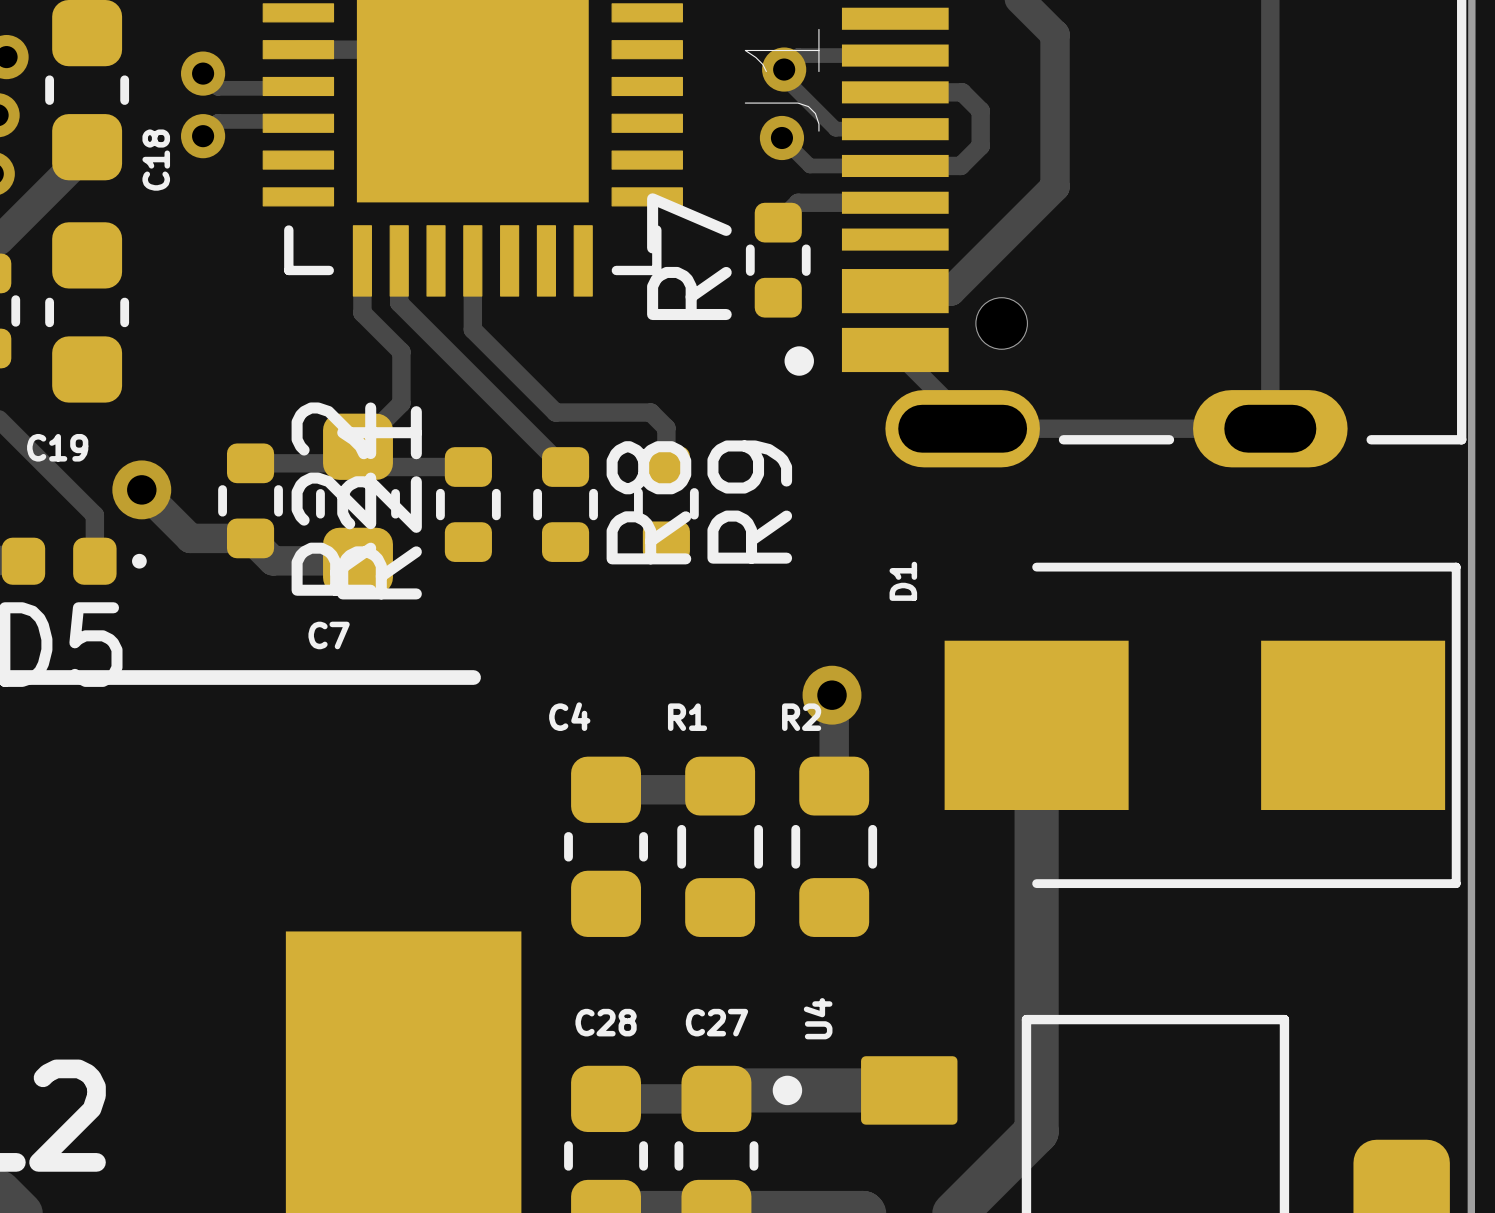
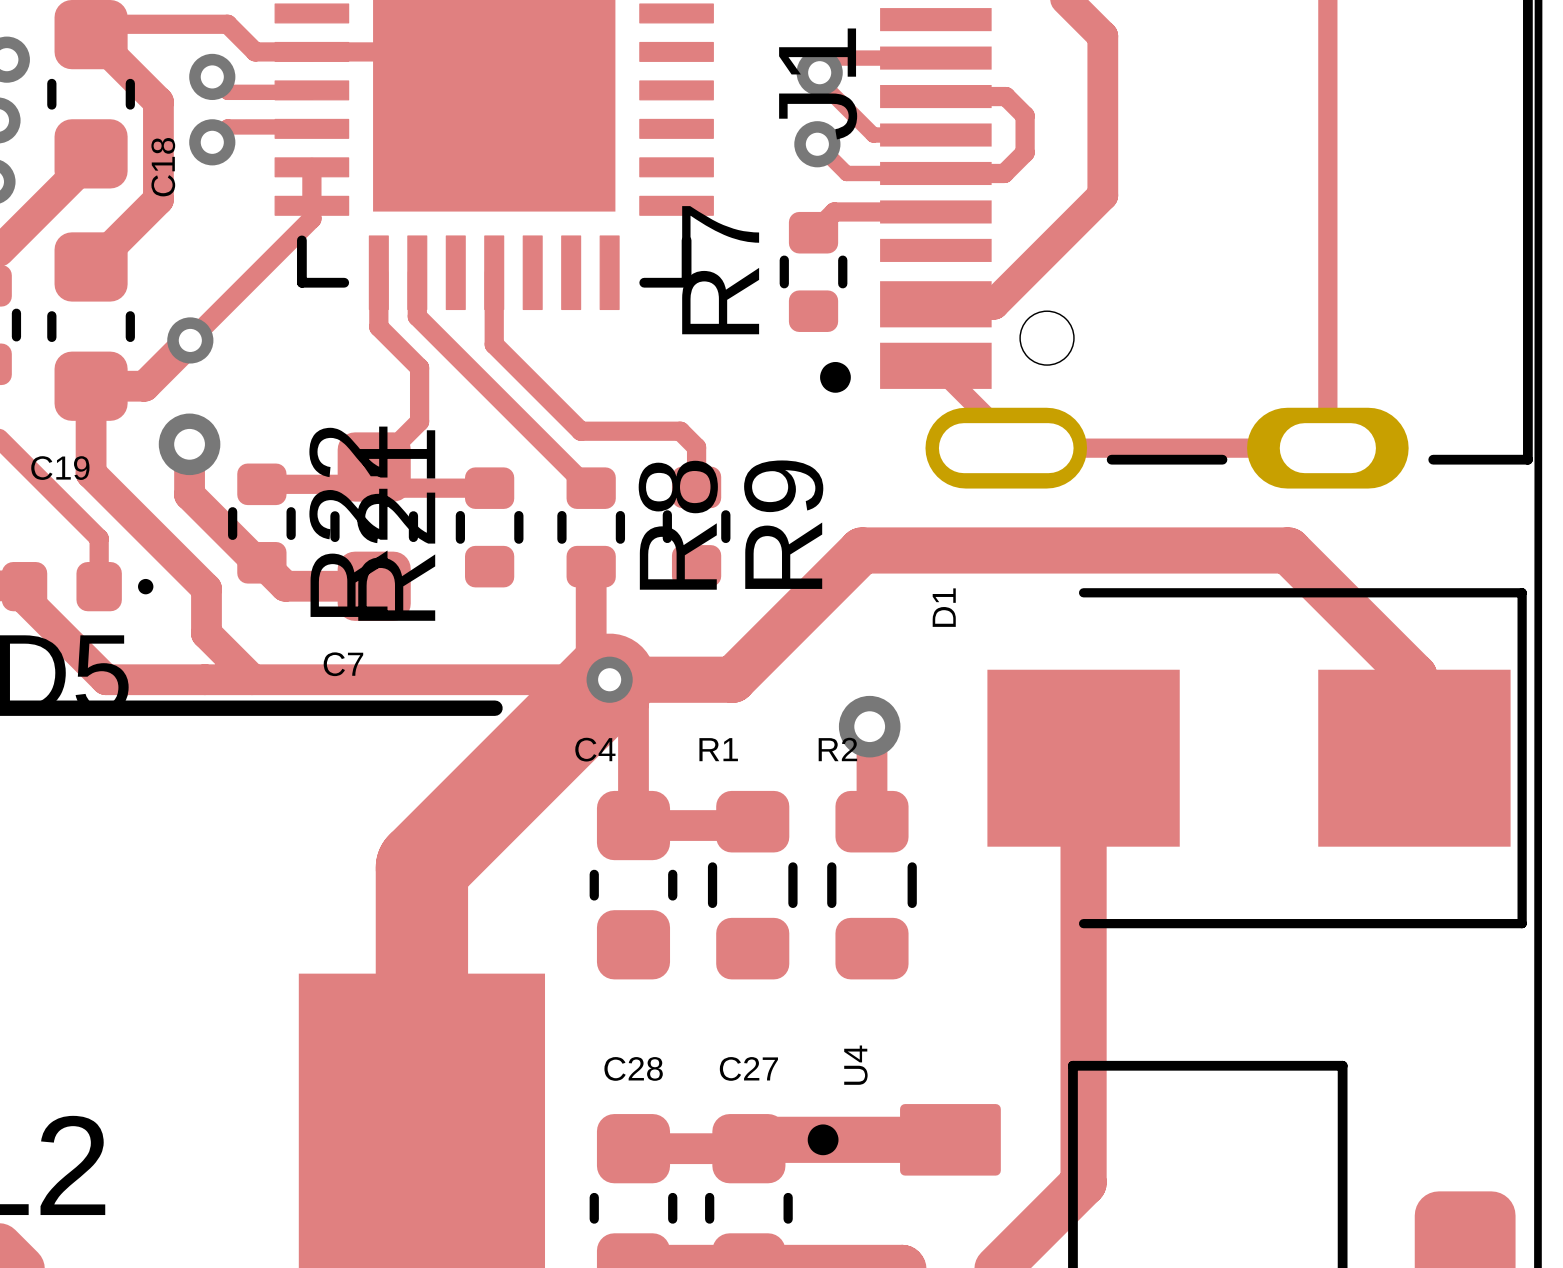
track: none -> (311, 51) (255, 51) (227, 24) (101, 24) (91, 34) (158, 101) (158, 199) (91, 266)
track: none -> (311, 167) (311, 218) (144, 386) (91, 386) (91, 473) (206, 588) (206, 633) (252, 679)
via: none -> (190, 340)
track: (141, 489) (190, 538) (246, 538) -> (189, 444) (189, 494) (257, 562)
via position: (141, 489) -> (189, 444)
track: none -> (591, 566) (591, 661) (633, 703) (633, 825)
track: none -> (24, 586) (24, 598) (106, 679) (609, 679)
track: none -> (609, 679) (421, 867) (421, 1169)
track: none -> (609, 679) (732, 679) (862, 550) (1288, 550) (1414, 676) (1414, 758)
via: none -> (609, 679)

